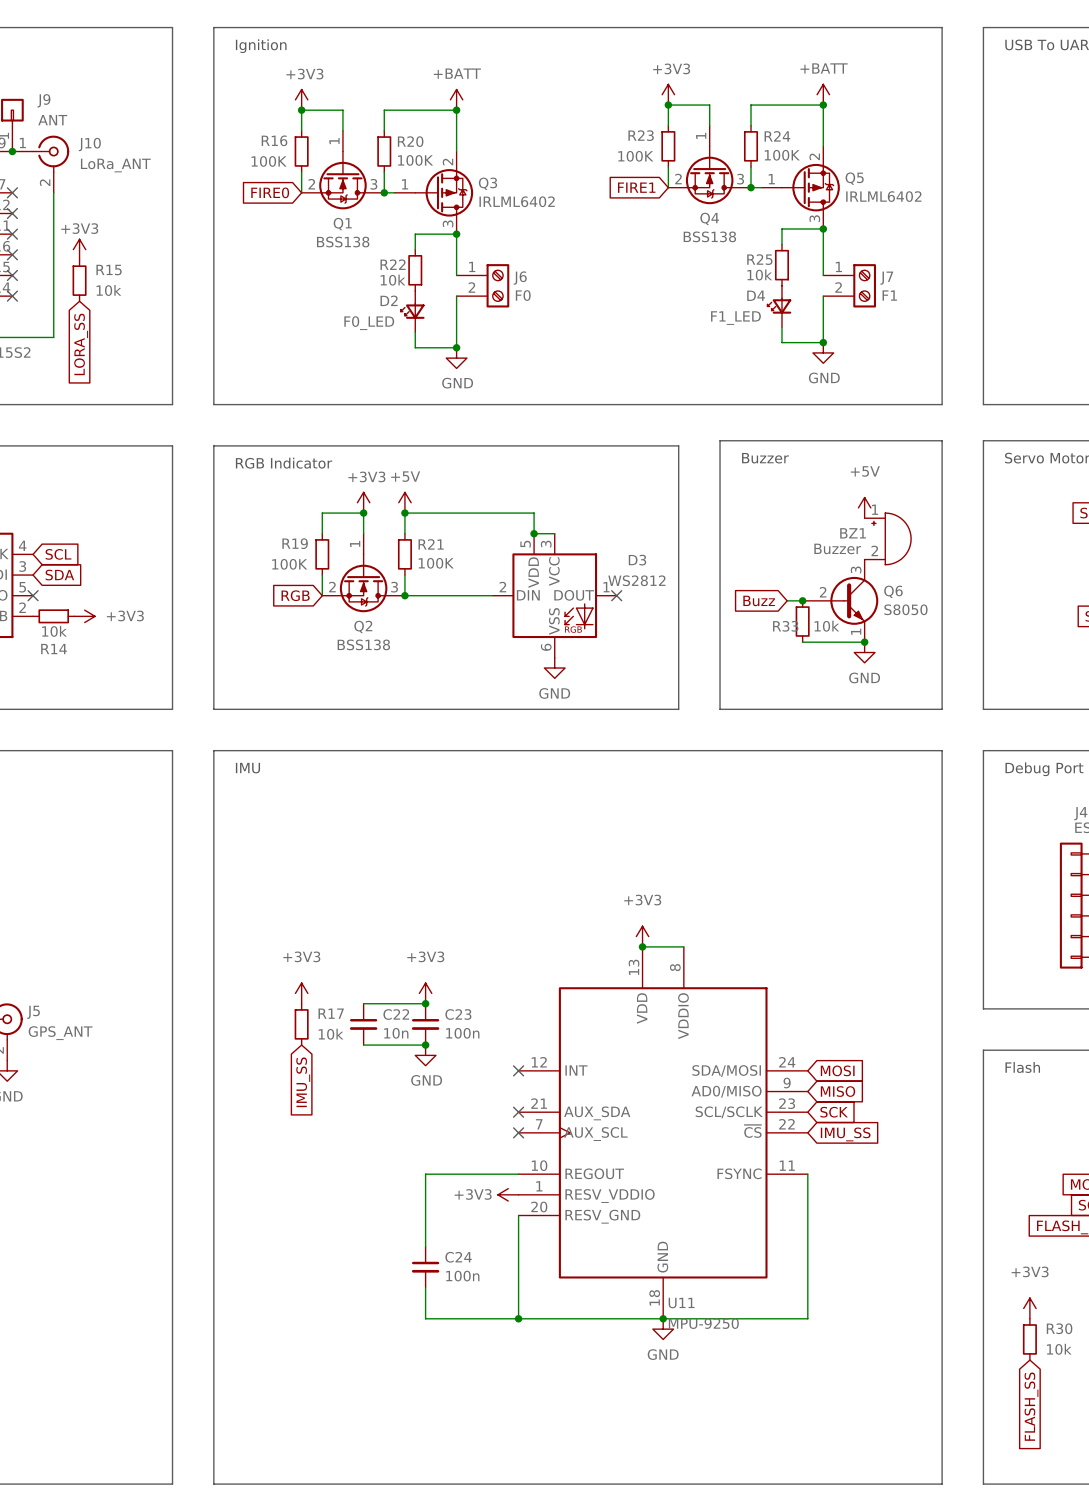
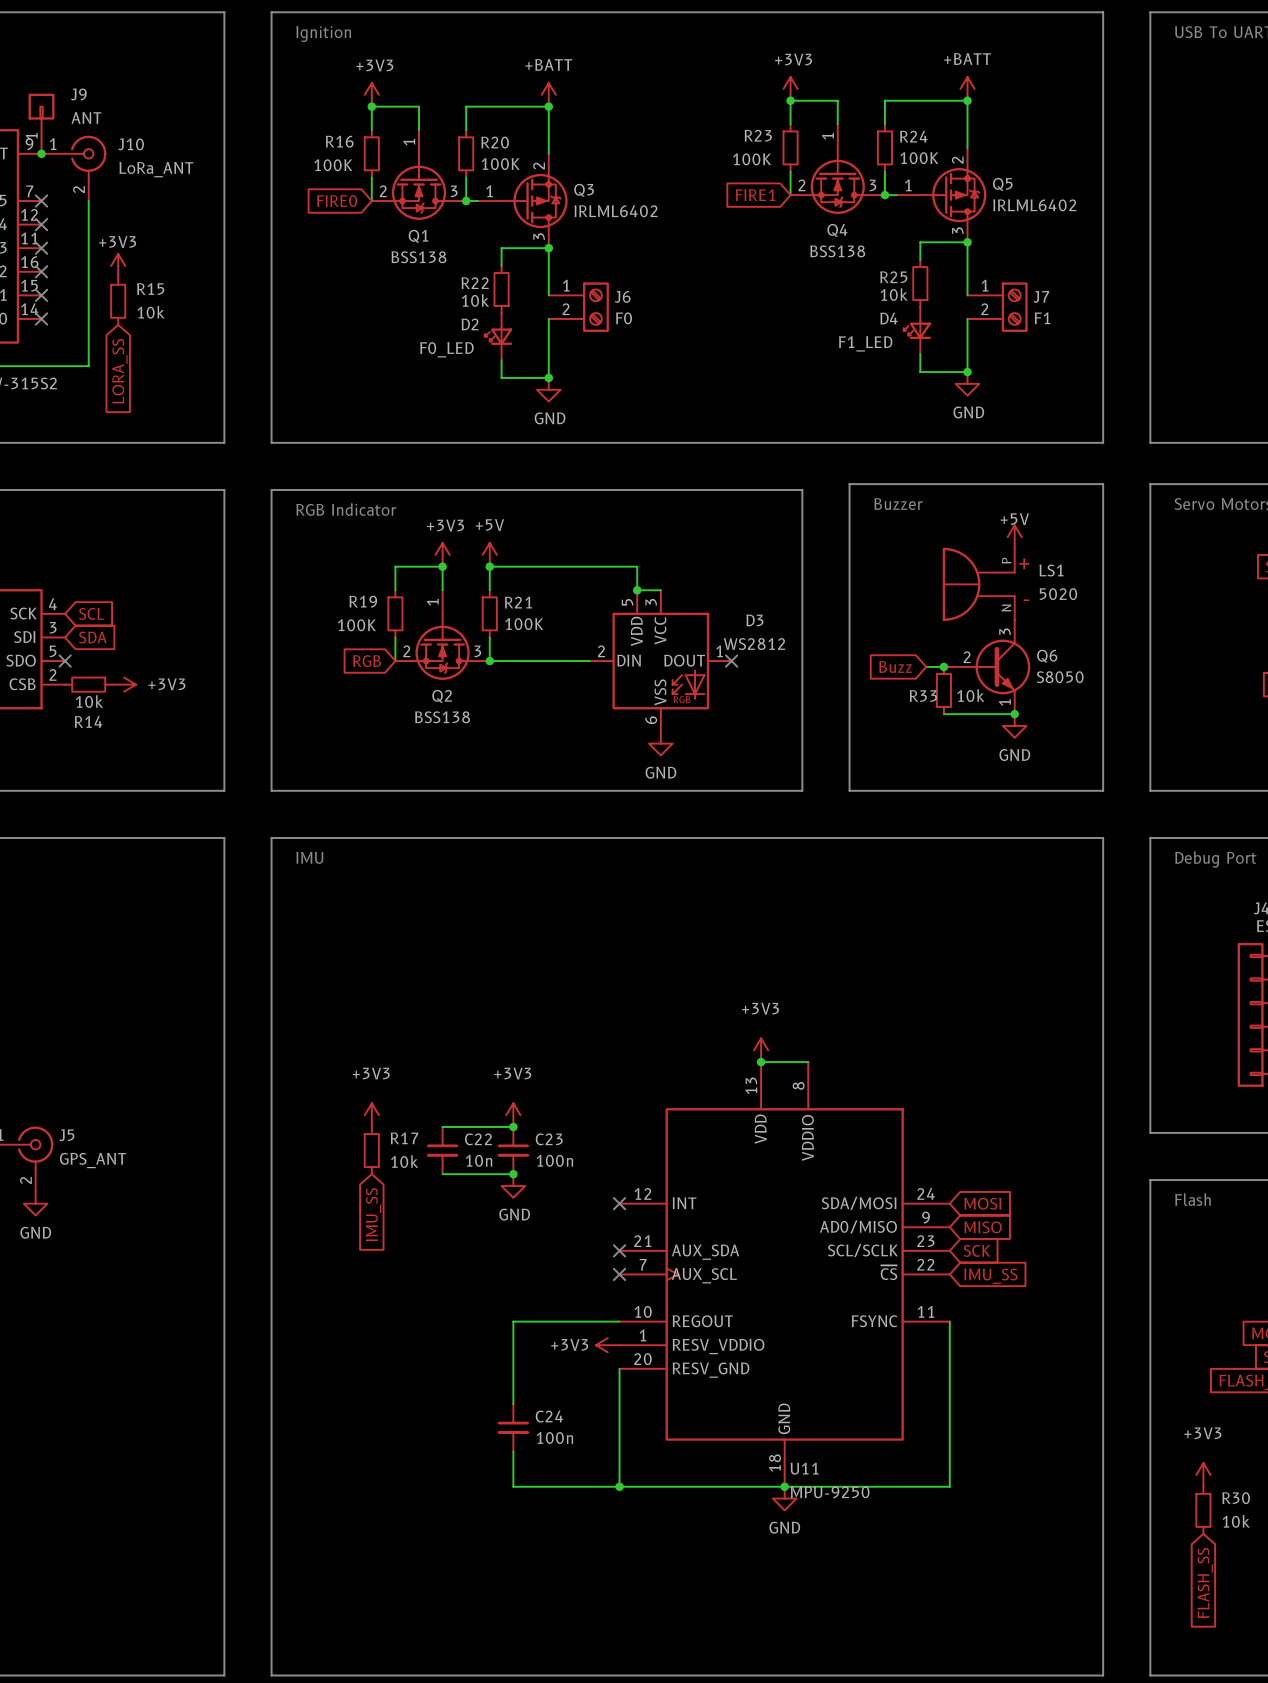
power symbol position: +5V (864, 507) -> +5V (1014, 537)
LS1: none -> 5020 (979, 584)
BZ1: Buzzer (887, 538) -> none

